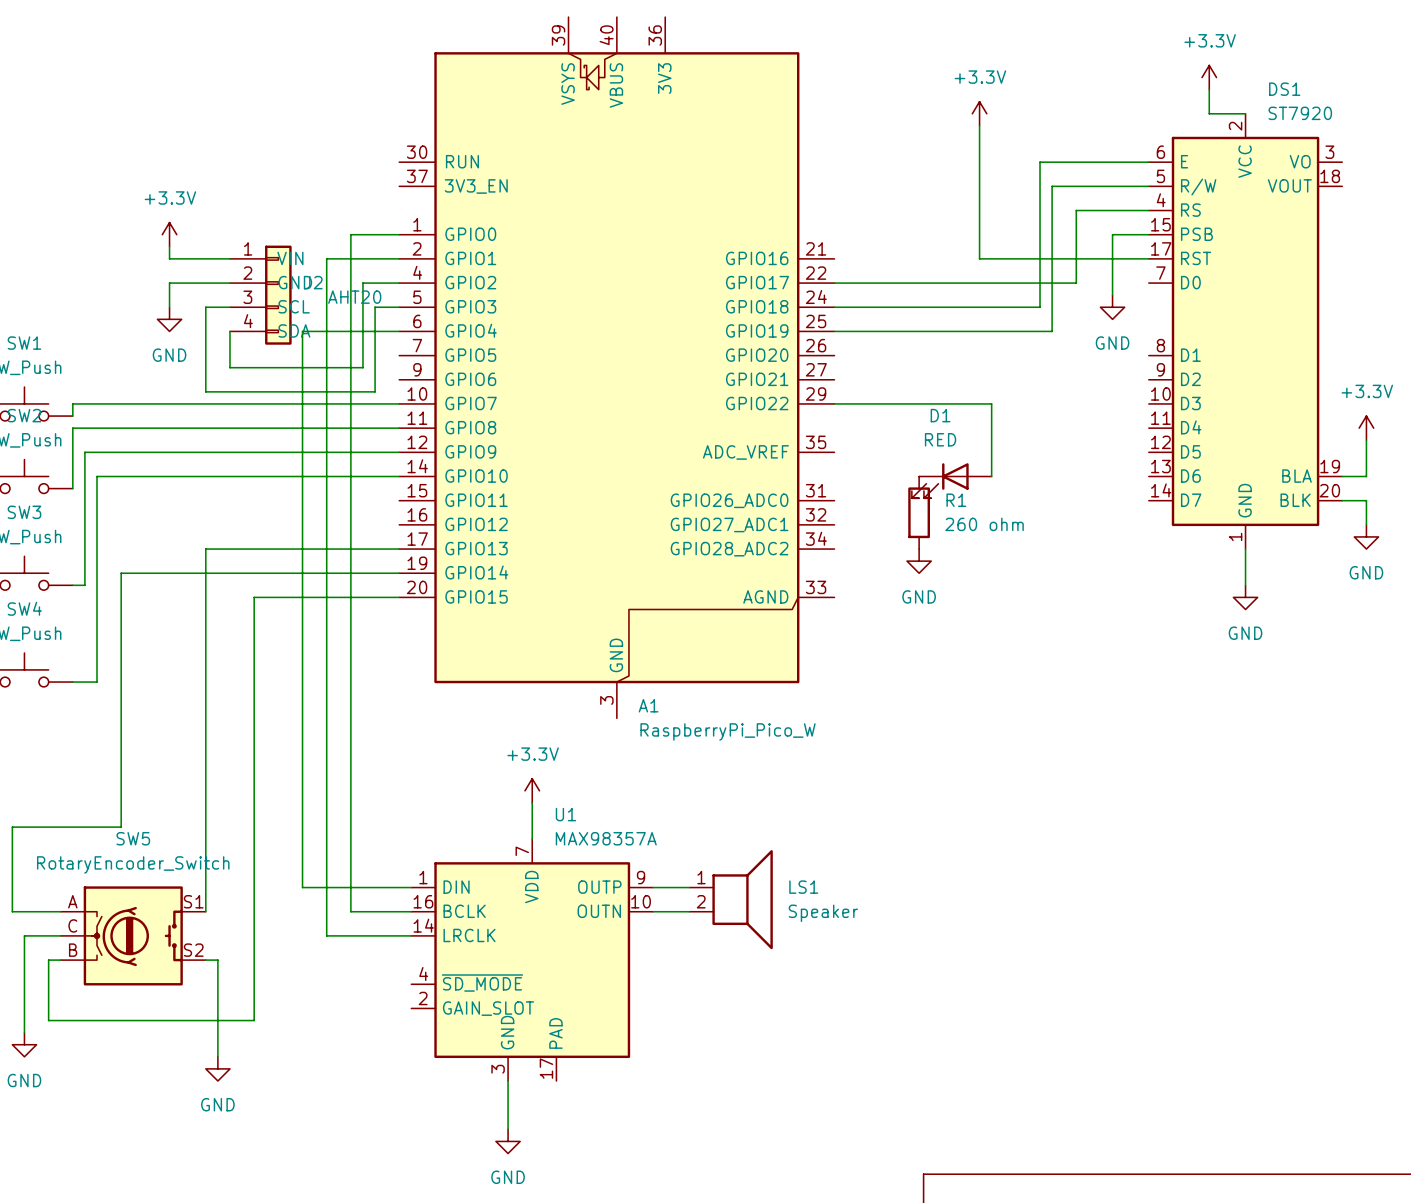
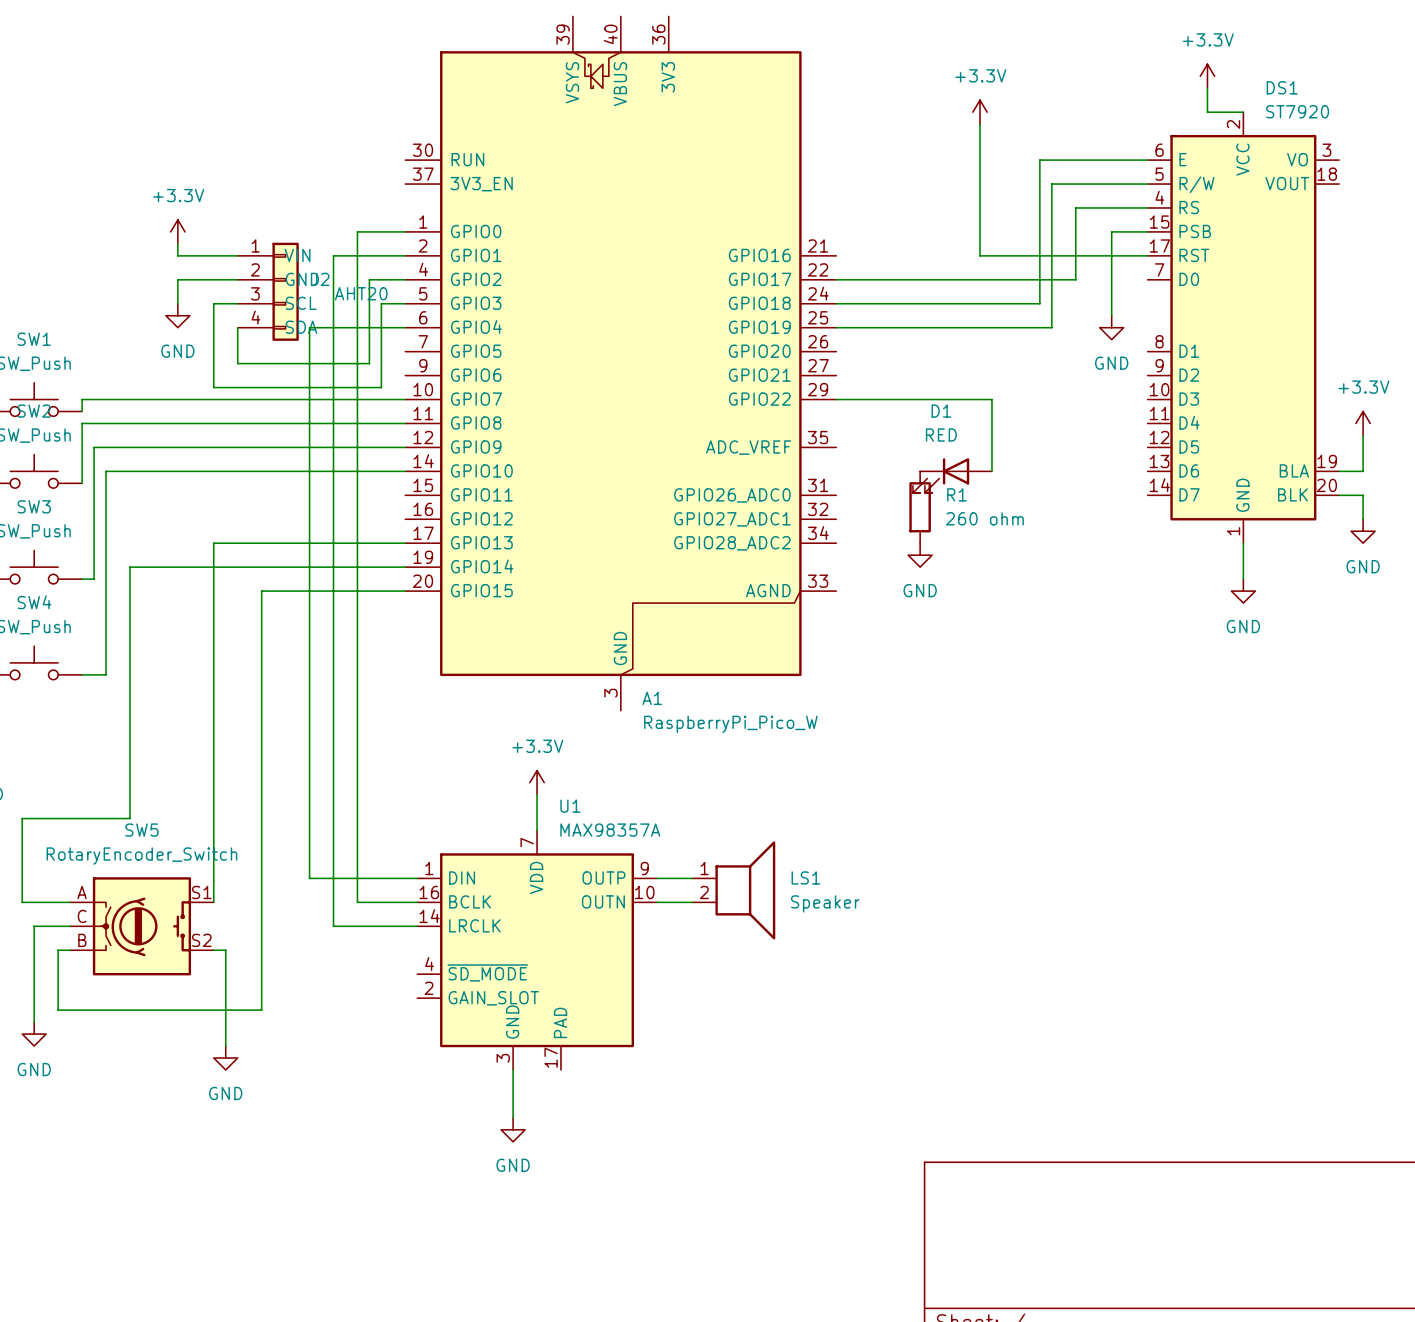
power symbol position: GND (1112, 307) -> GND (1111, 327)

